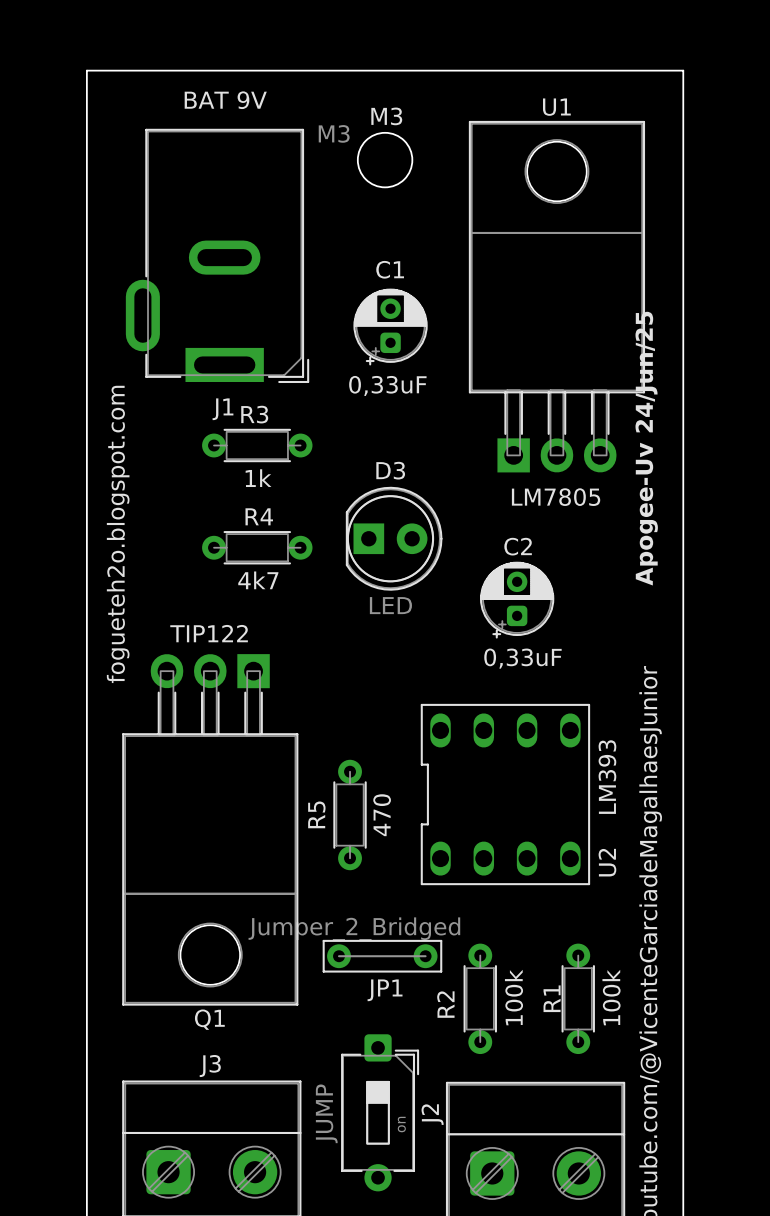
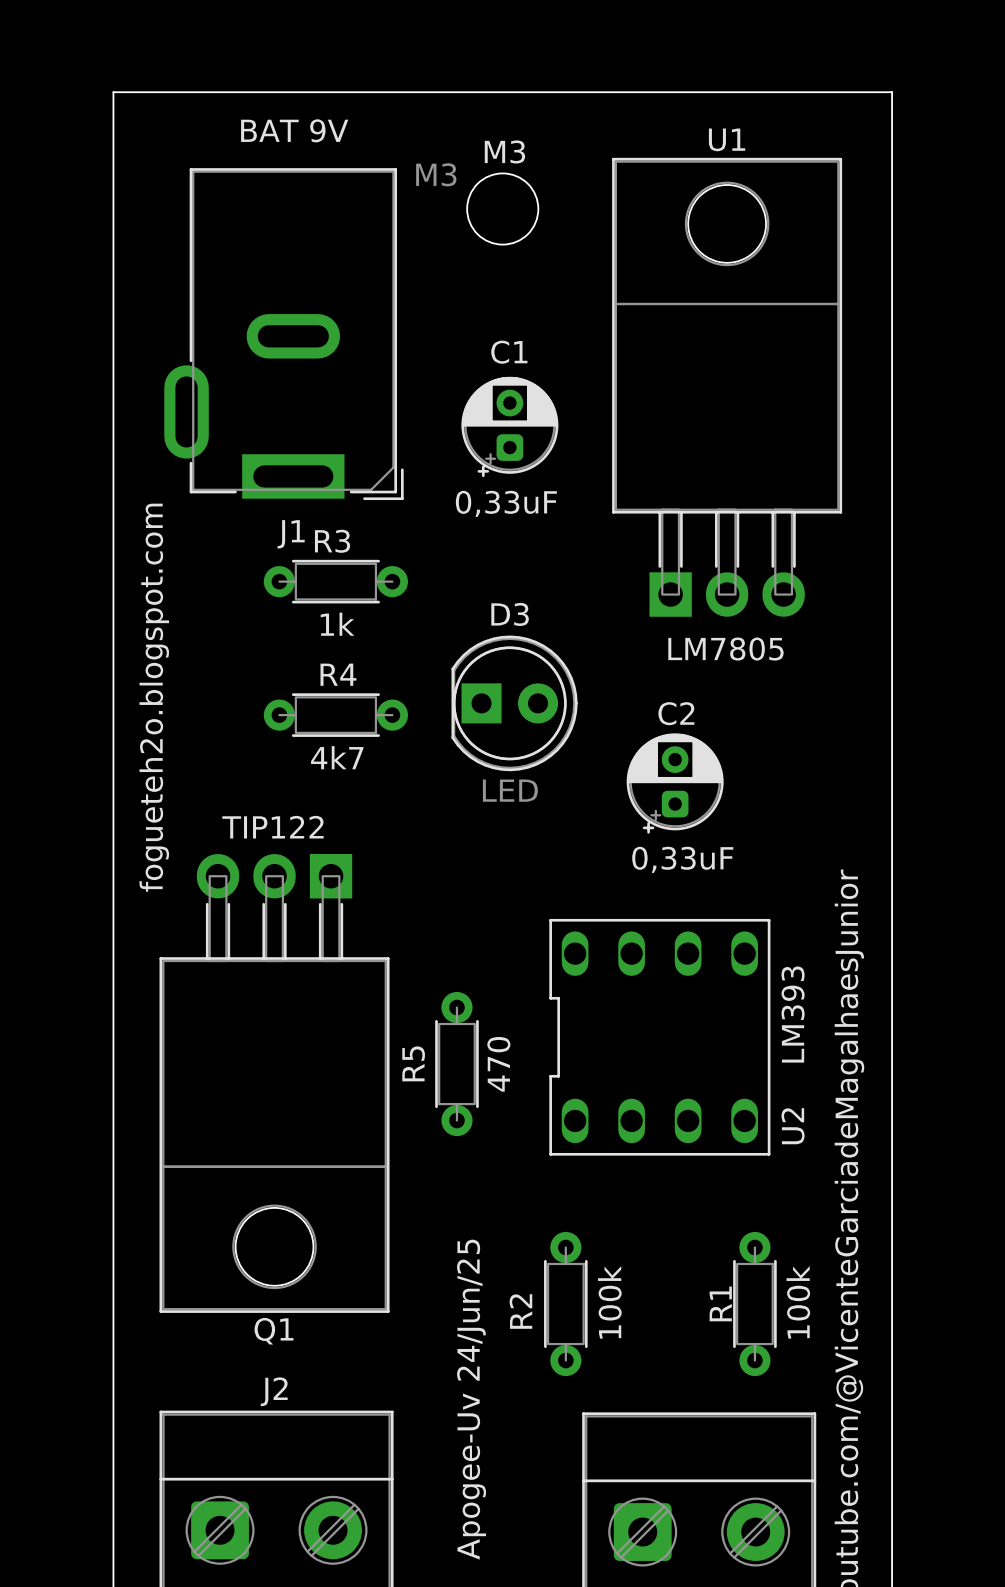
text: Apogee-Uv 24/Jun/25 (646, 448) -> none
JP1: Jumper_2_Bridged (382, 956) -> none
R2 position: (480, 998) -> (565, 1304)
J3 name: J3 (210, 1066) -> J2 (274, 1391)
text: none -> Apogee-Uv 24/Jun/25 (471, 1399)
J2: JUMP (380, 1112) -> none

